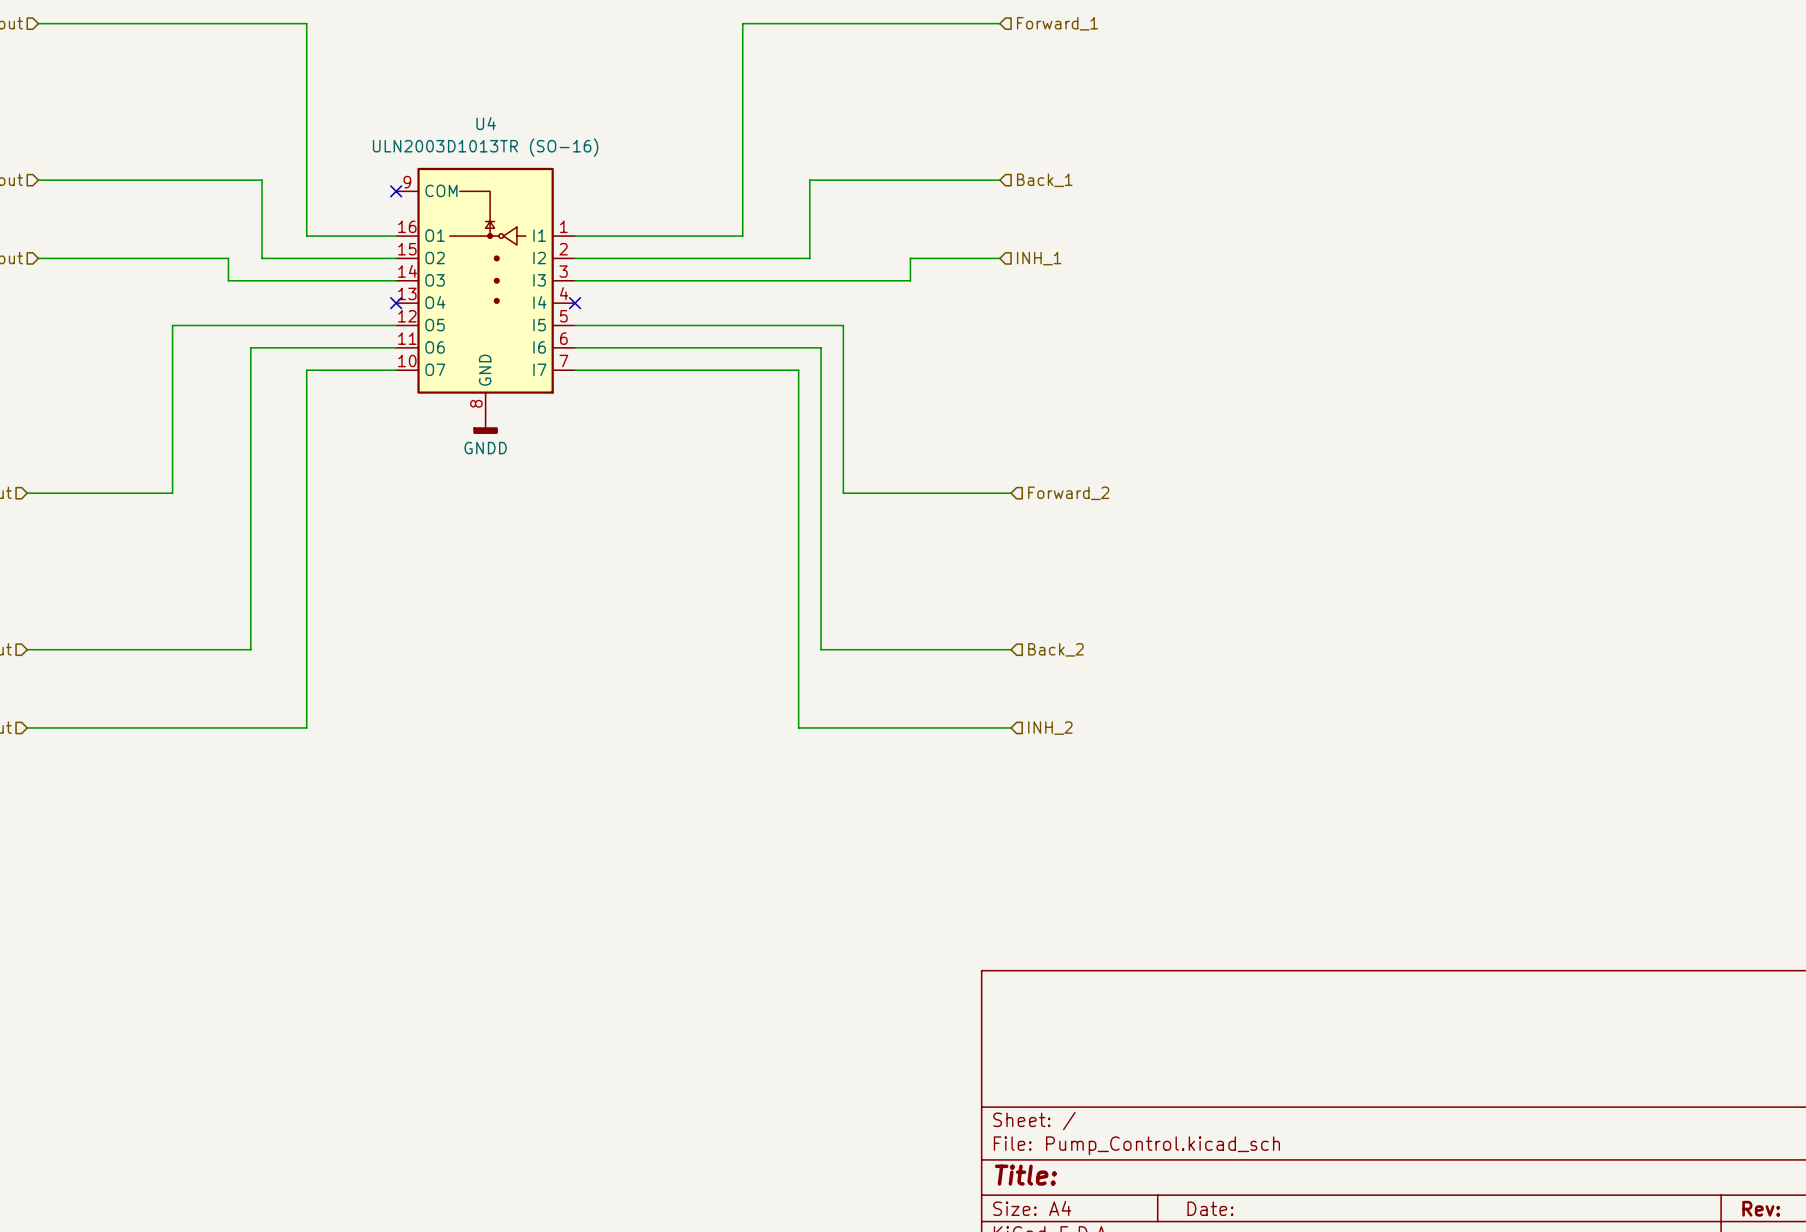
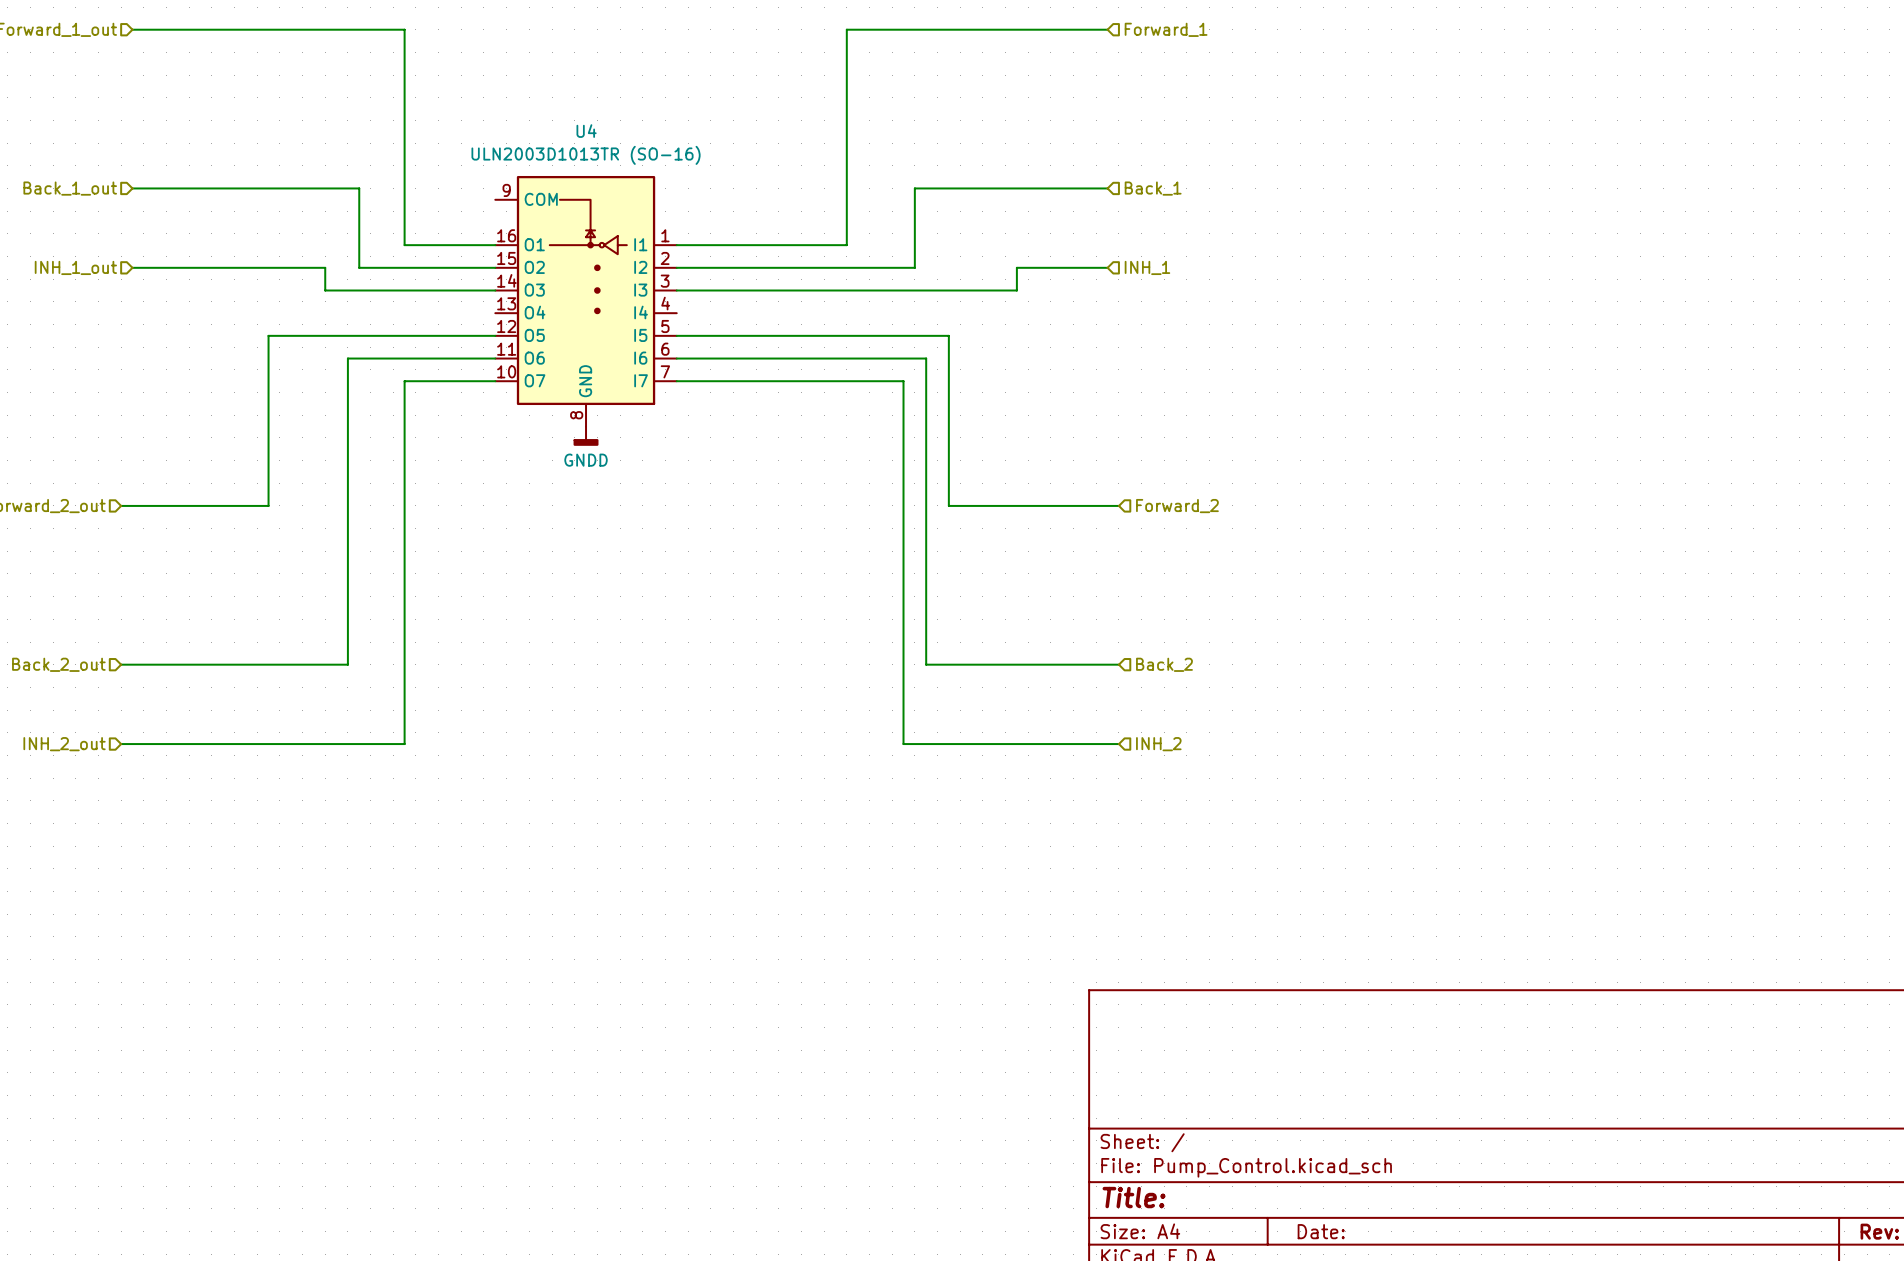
no-connect mark: (396, 191) -> none
no-connect mark: (396, 303) -> none
no-connect mark: (575, 303) -> none

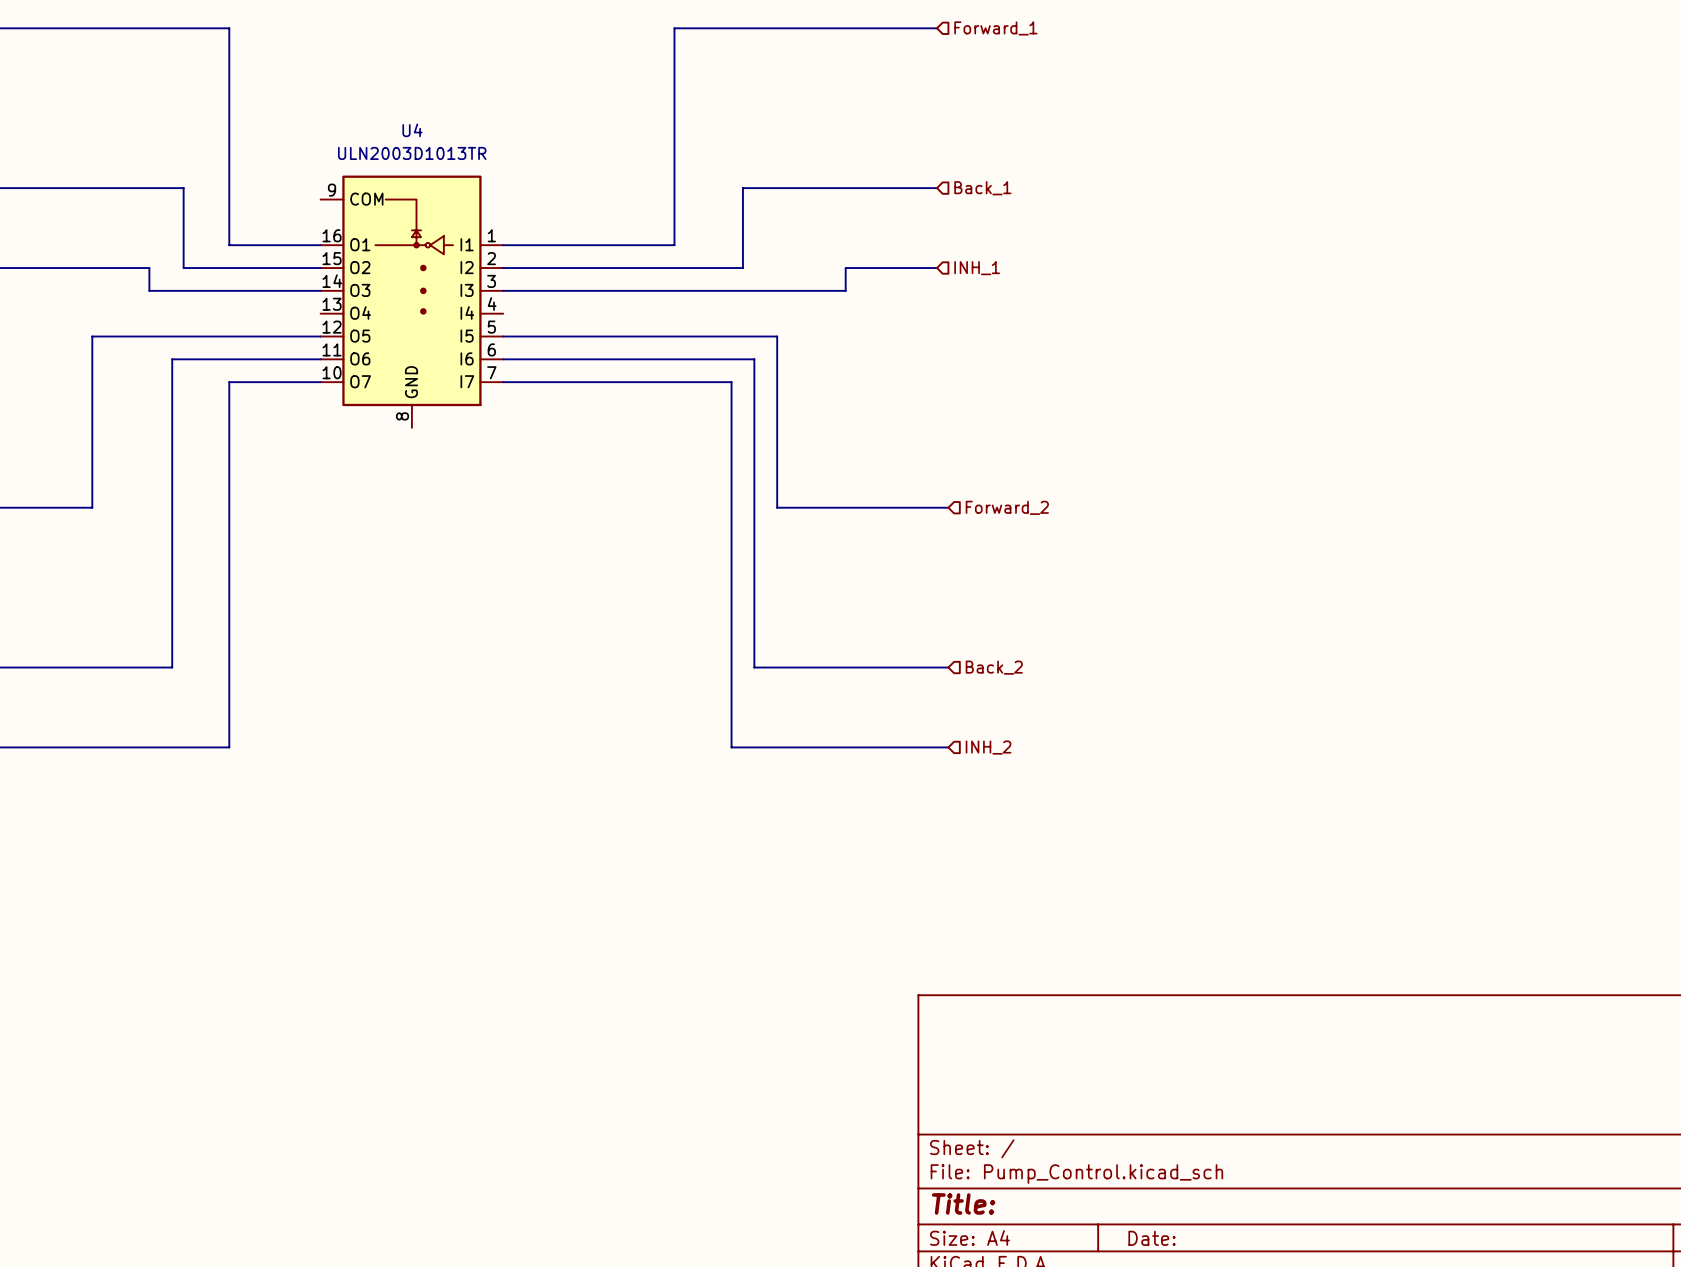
U4 value: ULN2003D1013TR (SO-16) (586, 155) -> ULN2003D1013TR (412, 153)
power symbol: GNDD (586, 436) -> none

